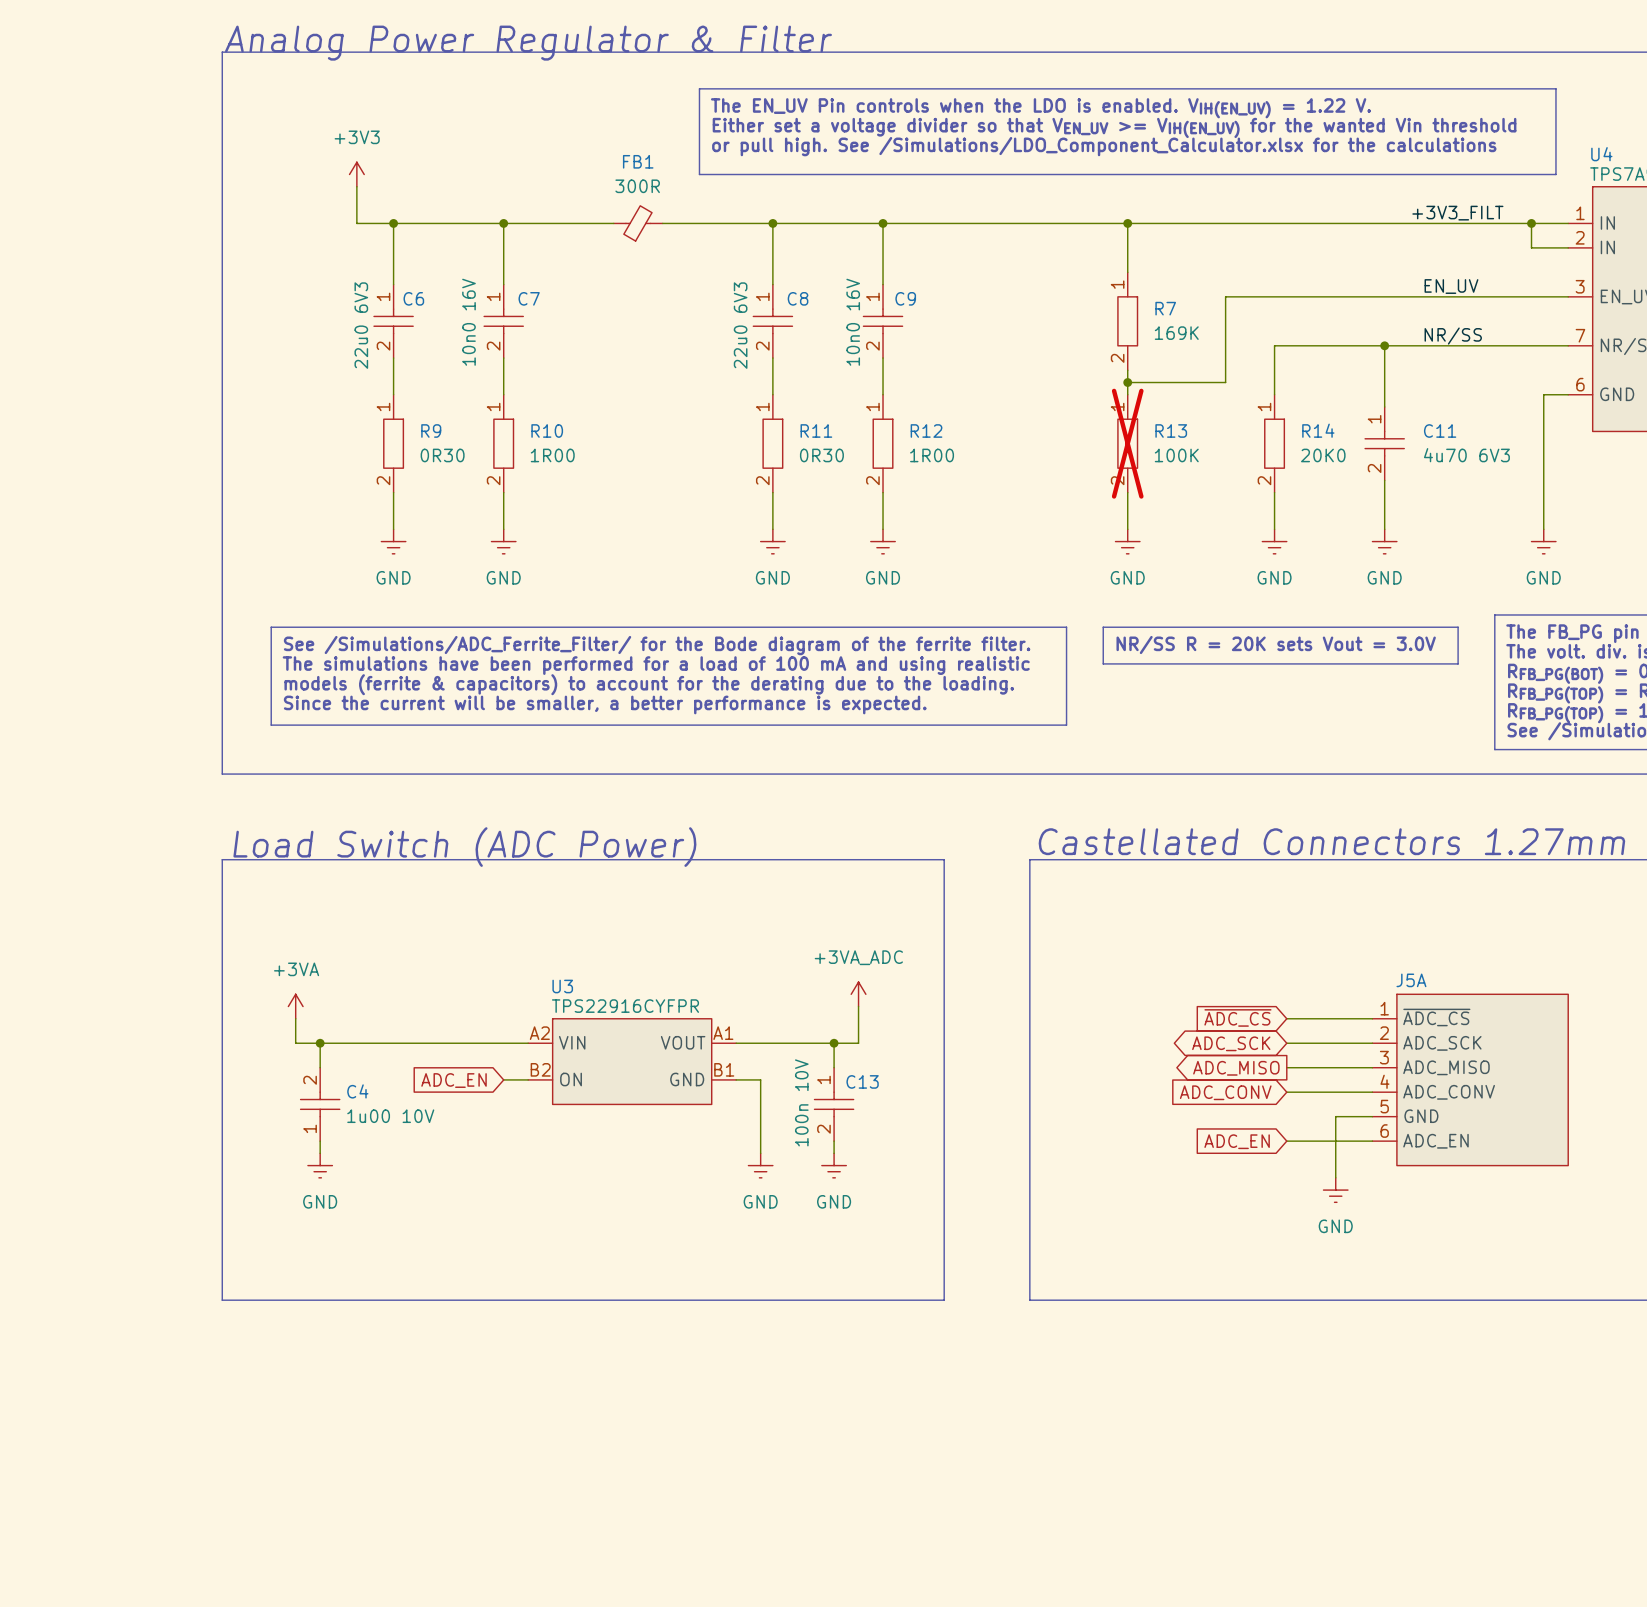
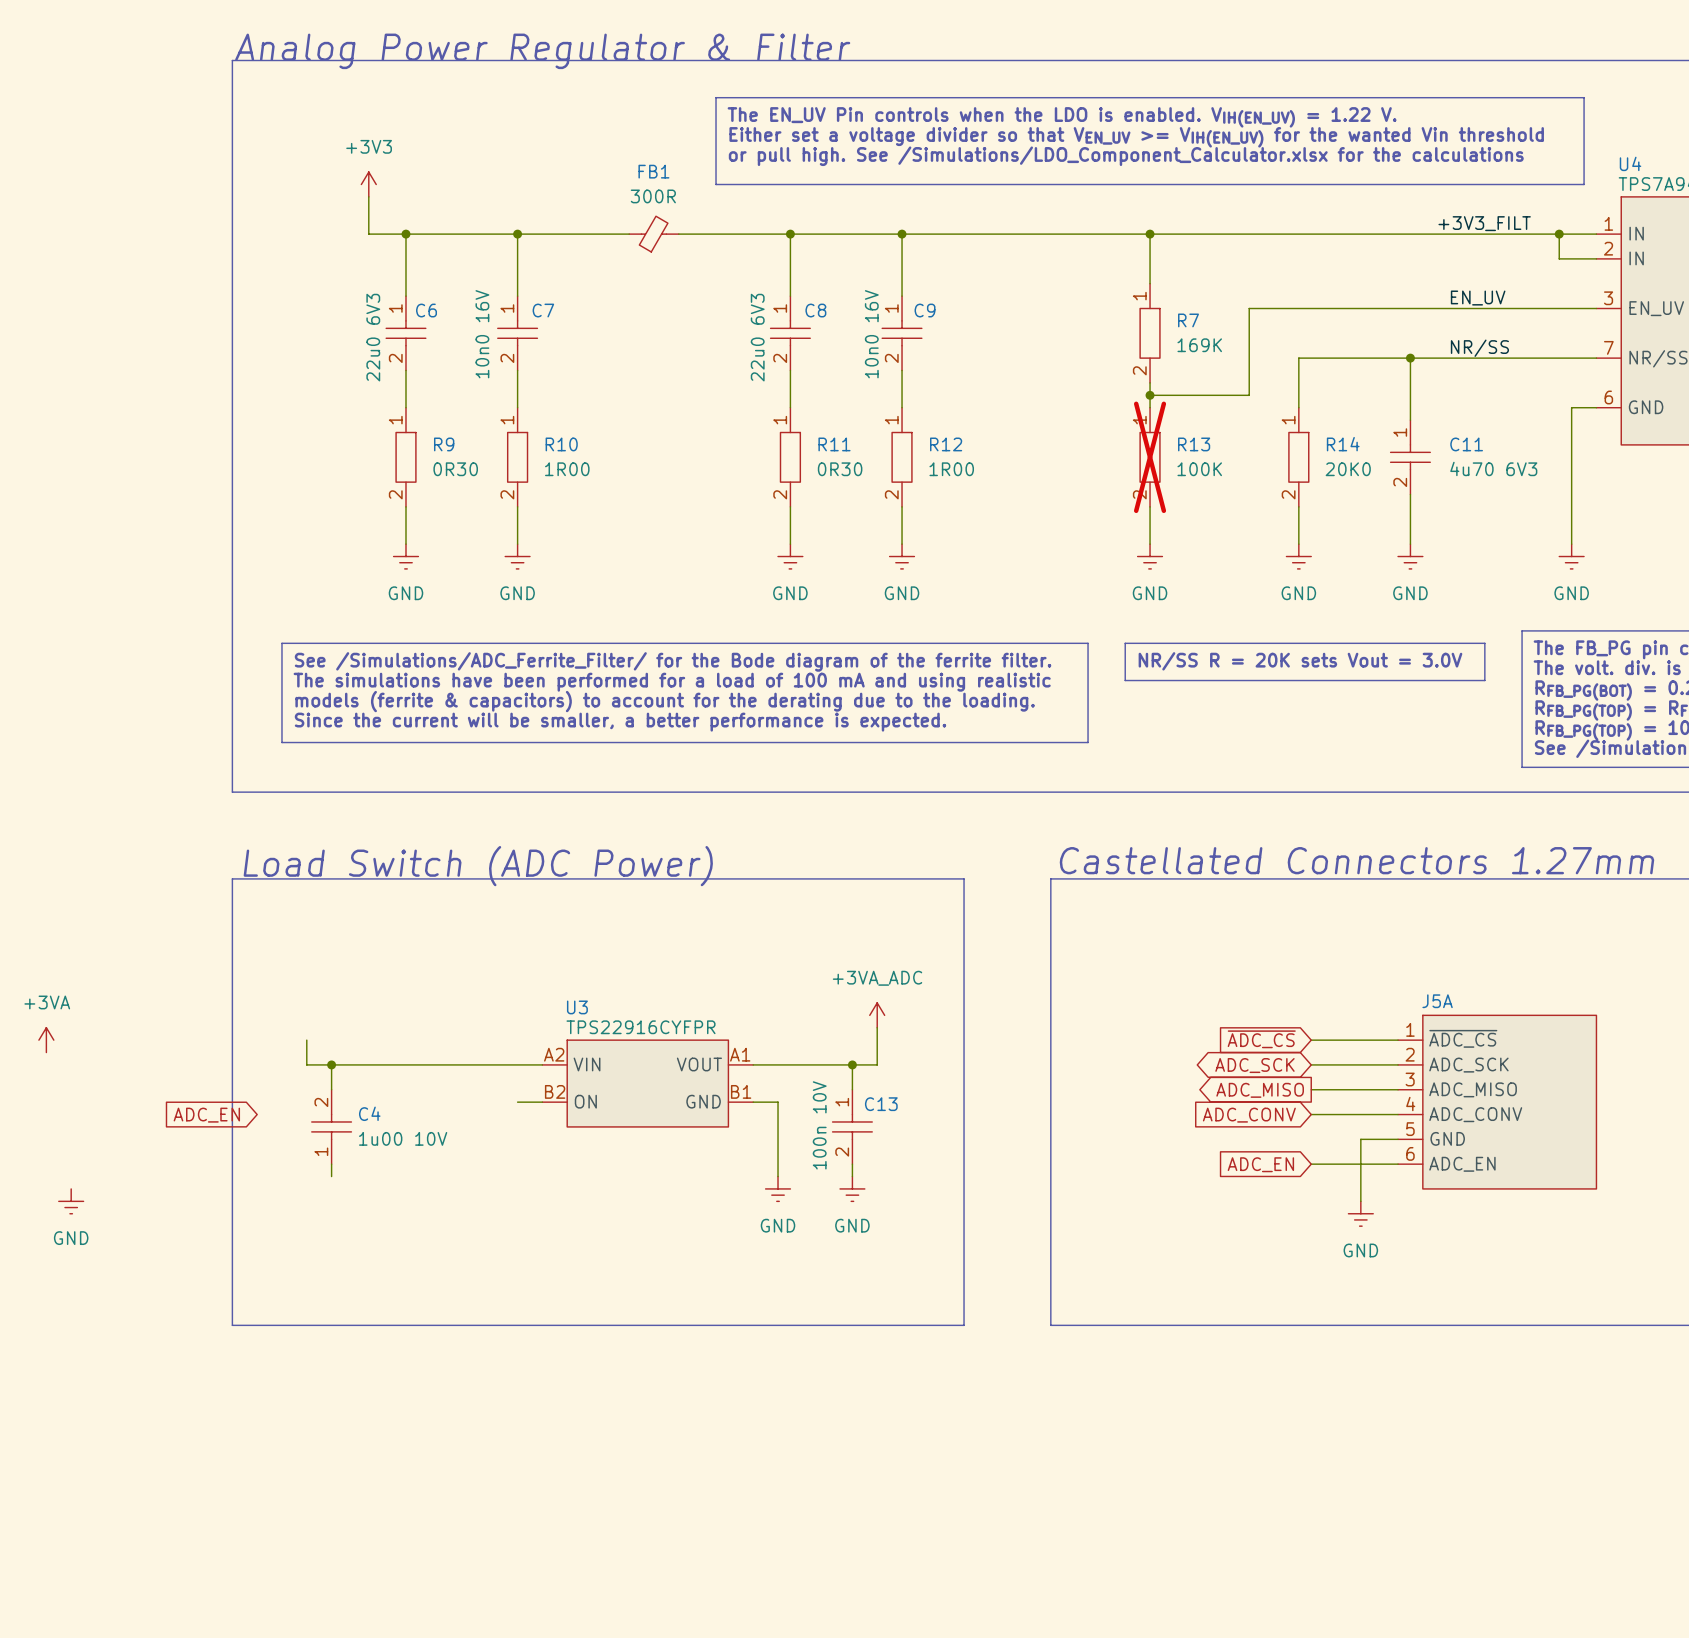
power symbol: +3VA (295, 1006) -> none
power symbol: none -> +3VA (46, 1040)
global label: ADC_EN (454, 1080) -> none
global label: none -> ADC_EN (206, 1115)
power symbol: GND (320, 1165) -> none
power symbol: none -> GND (71, 1201)

